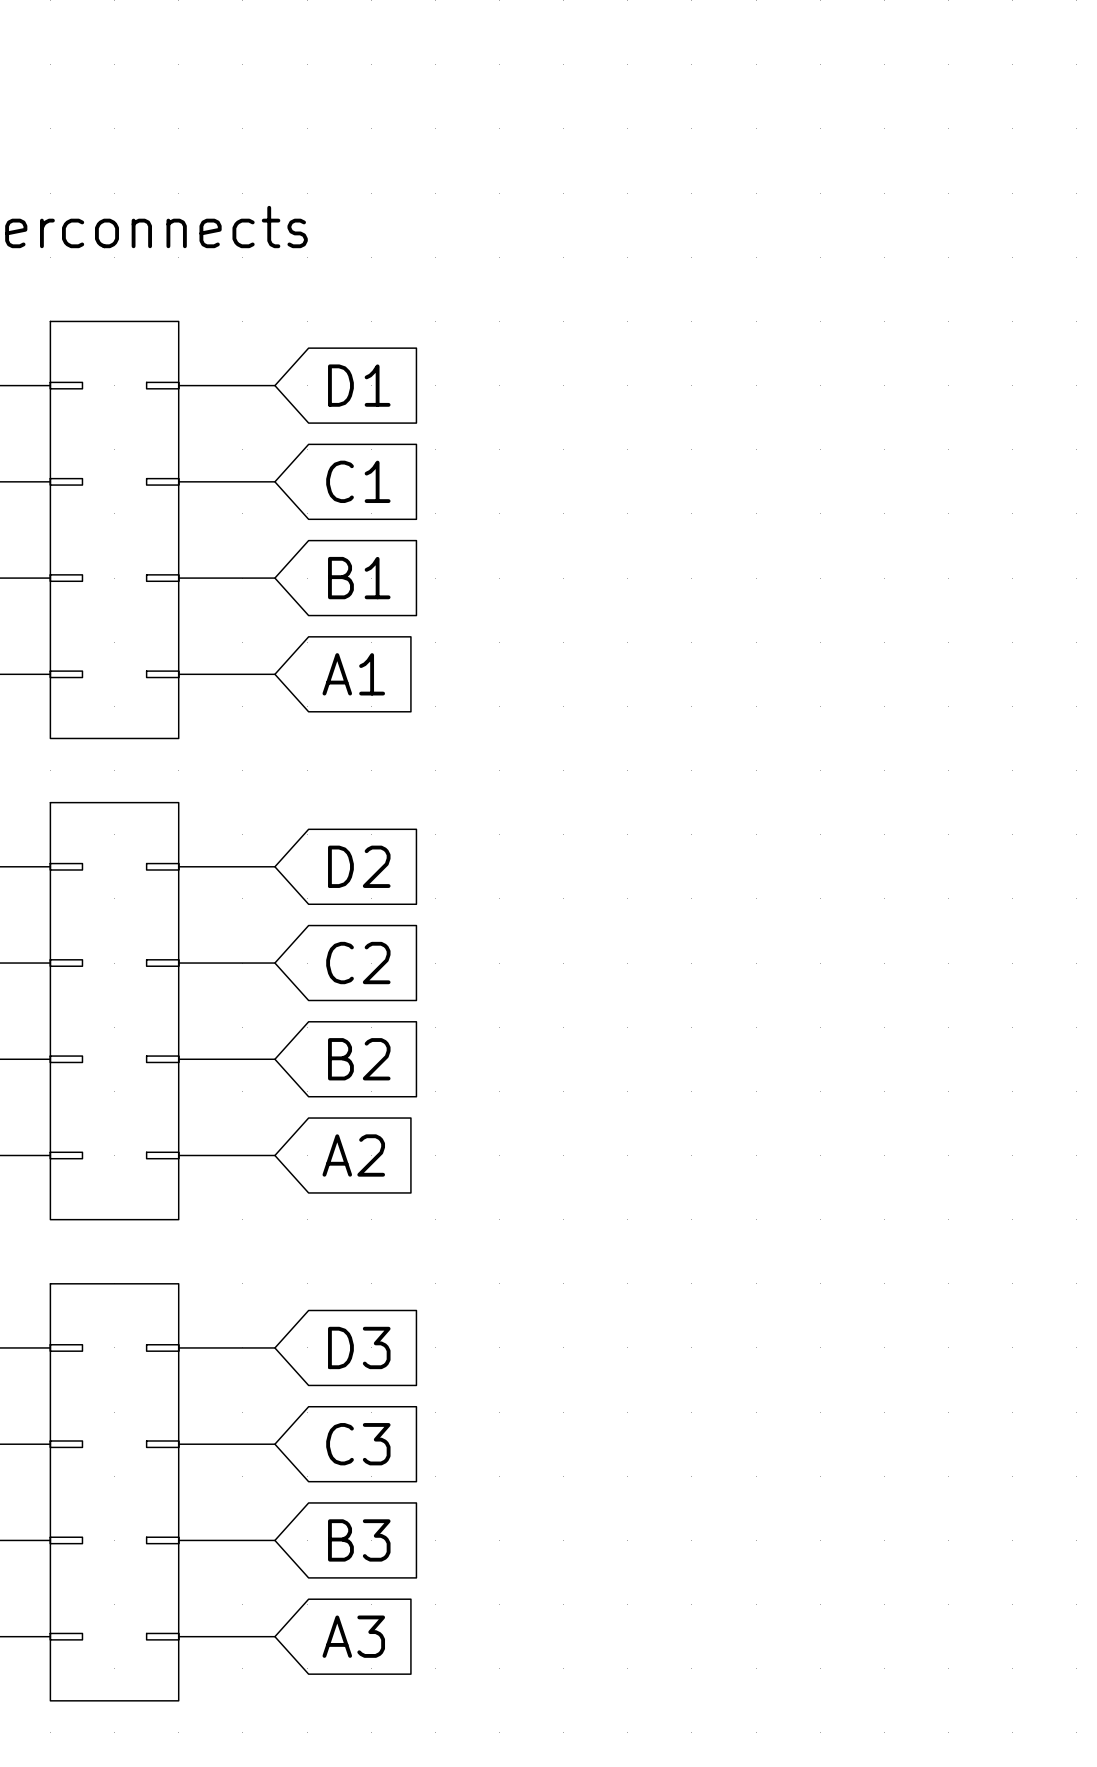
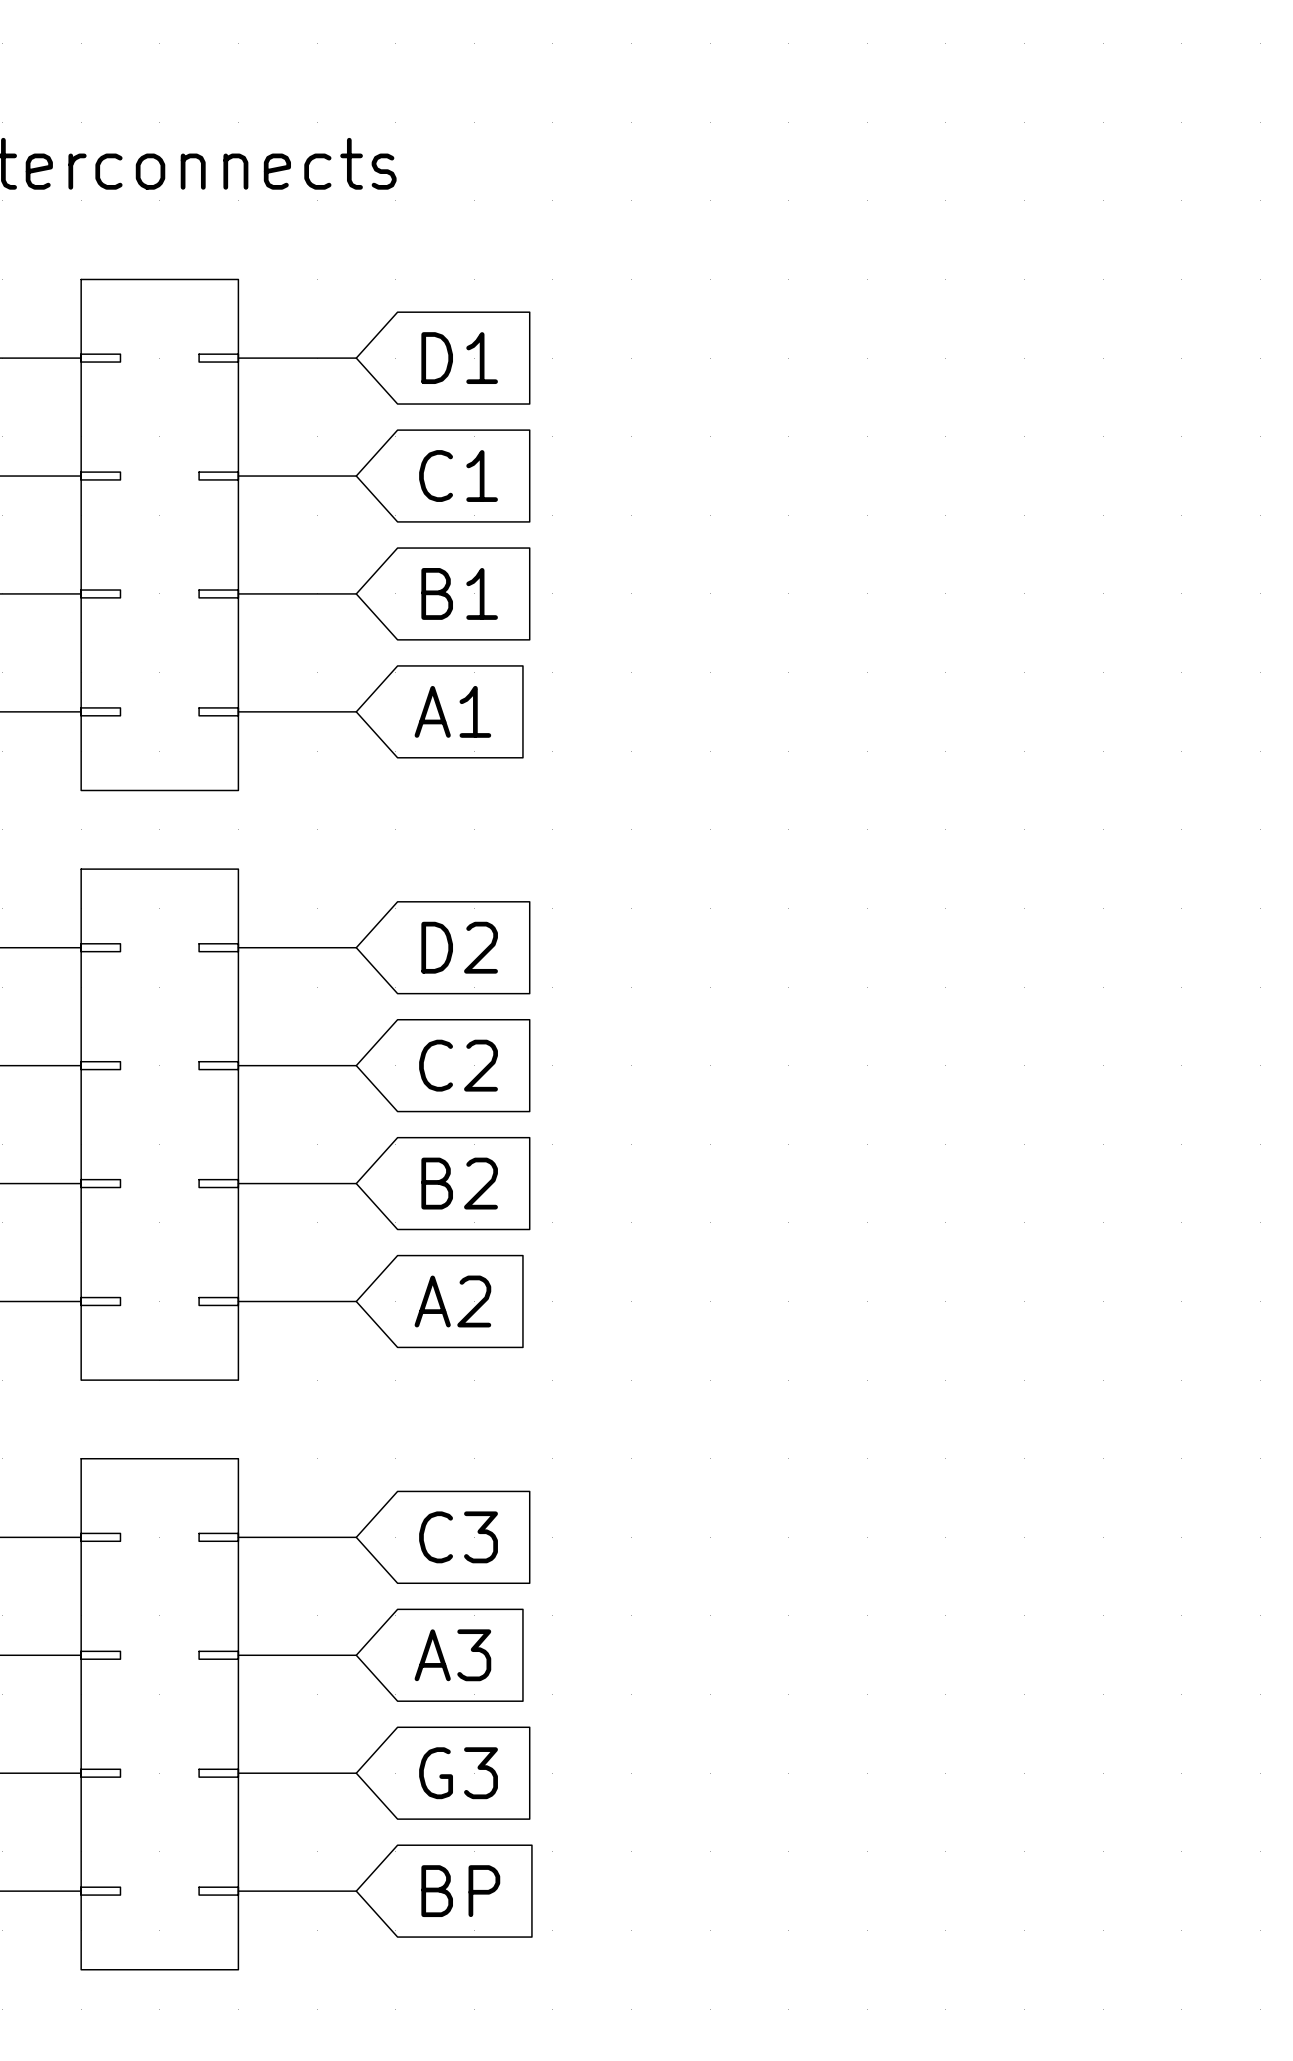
global label: D3 (359, 1347) -> C3 (458, 1537)
global label: C3 (358, 1444) -> A3 (452, 1655)
global label: B3 (359, 1540) -> G3 (458, 1773)
global label: A3 (353, 1636) -> BP (460, 1891)

